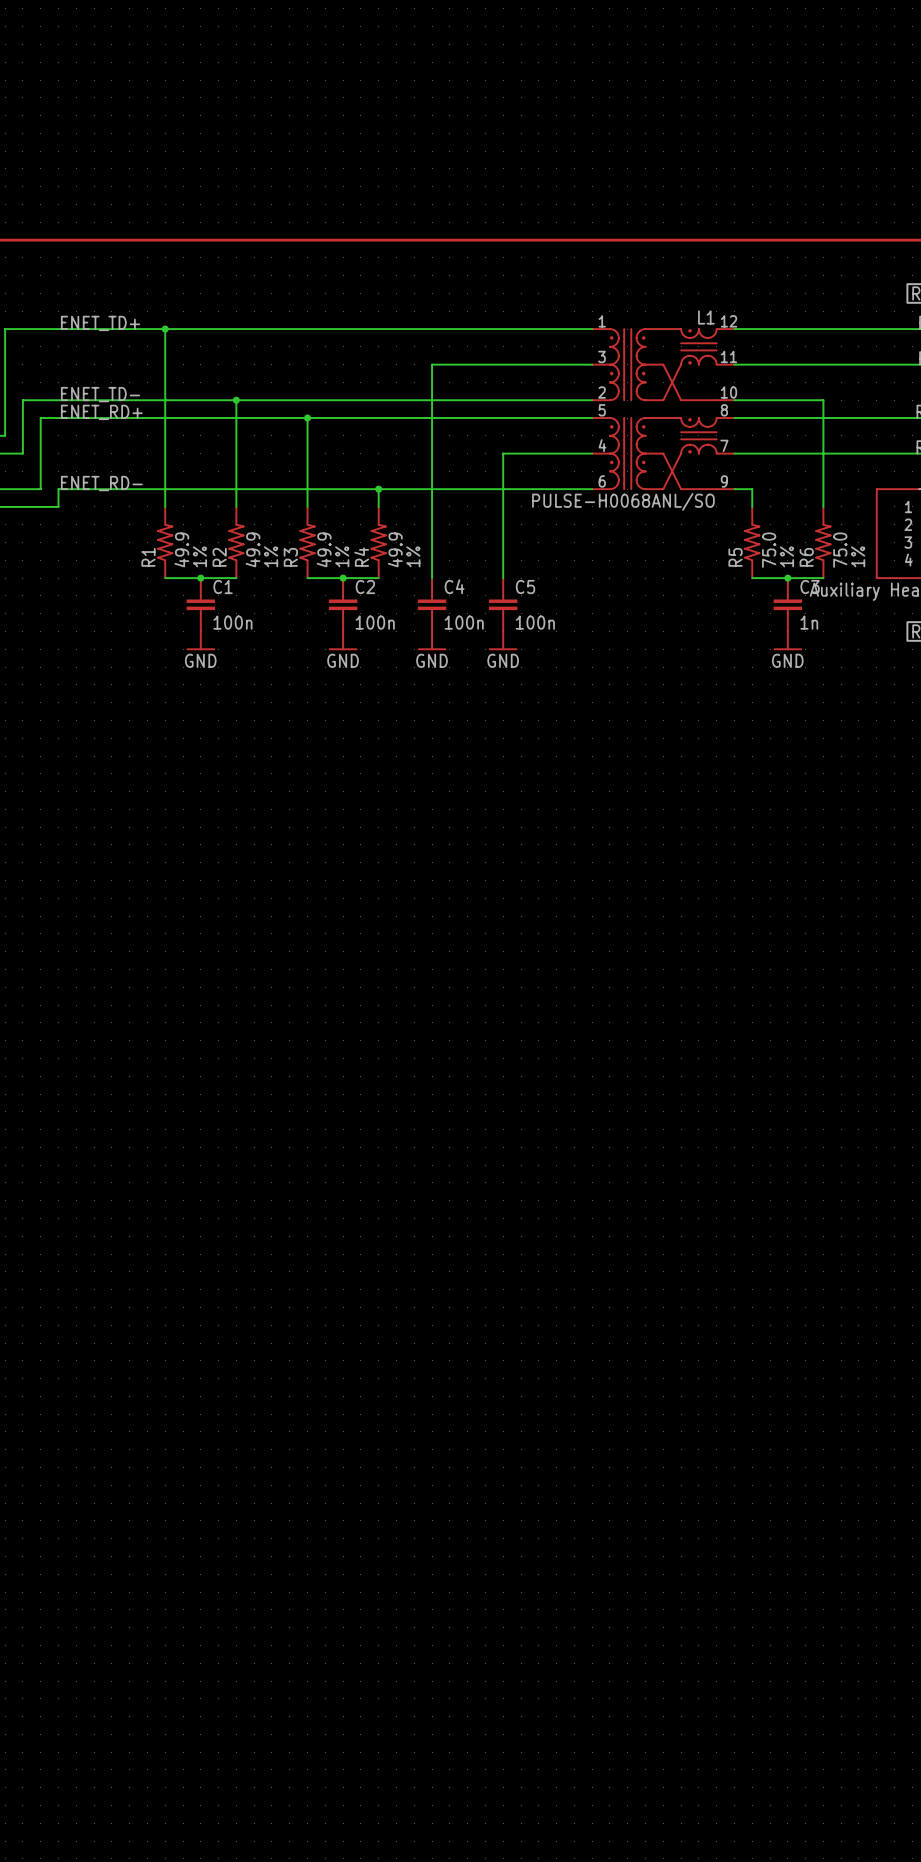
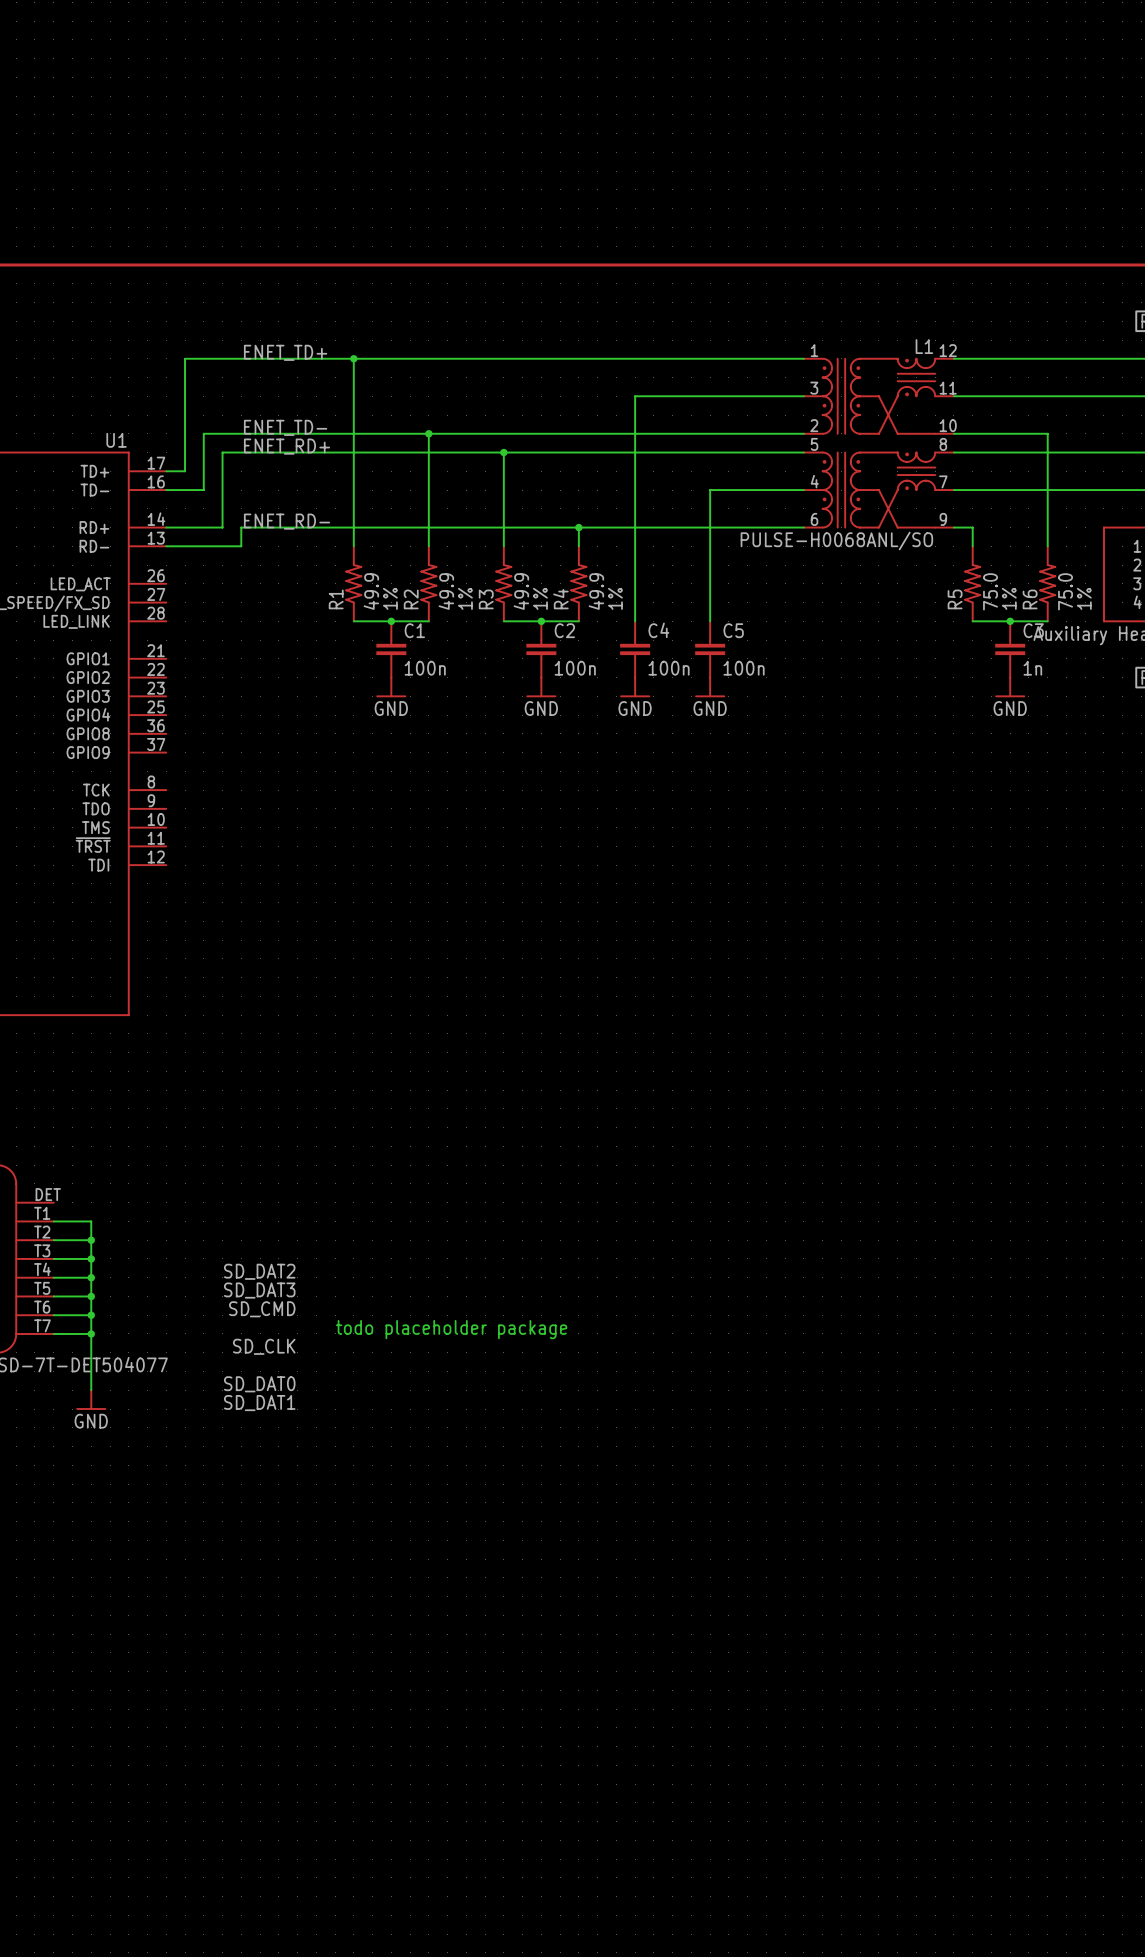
label: none -> SD_DAT2 (259, 1271)
label: none -> SD_DAT3 (259, 1290)
label: none -> SD_CMD (262, 1309)
text: none -> todo placeholder package (451, 1329)
label: none -> SD_CLK (264, 1346)
label: none -> SD_DAT0 (259, 1384)
label: none -> SD_DAT1 (259, 1403)

